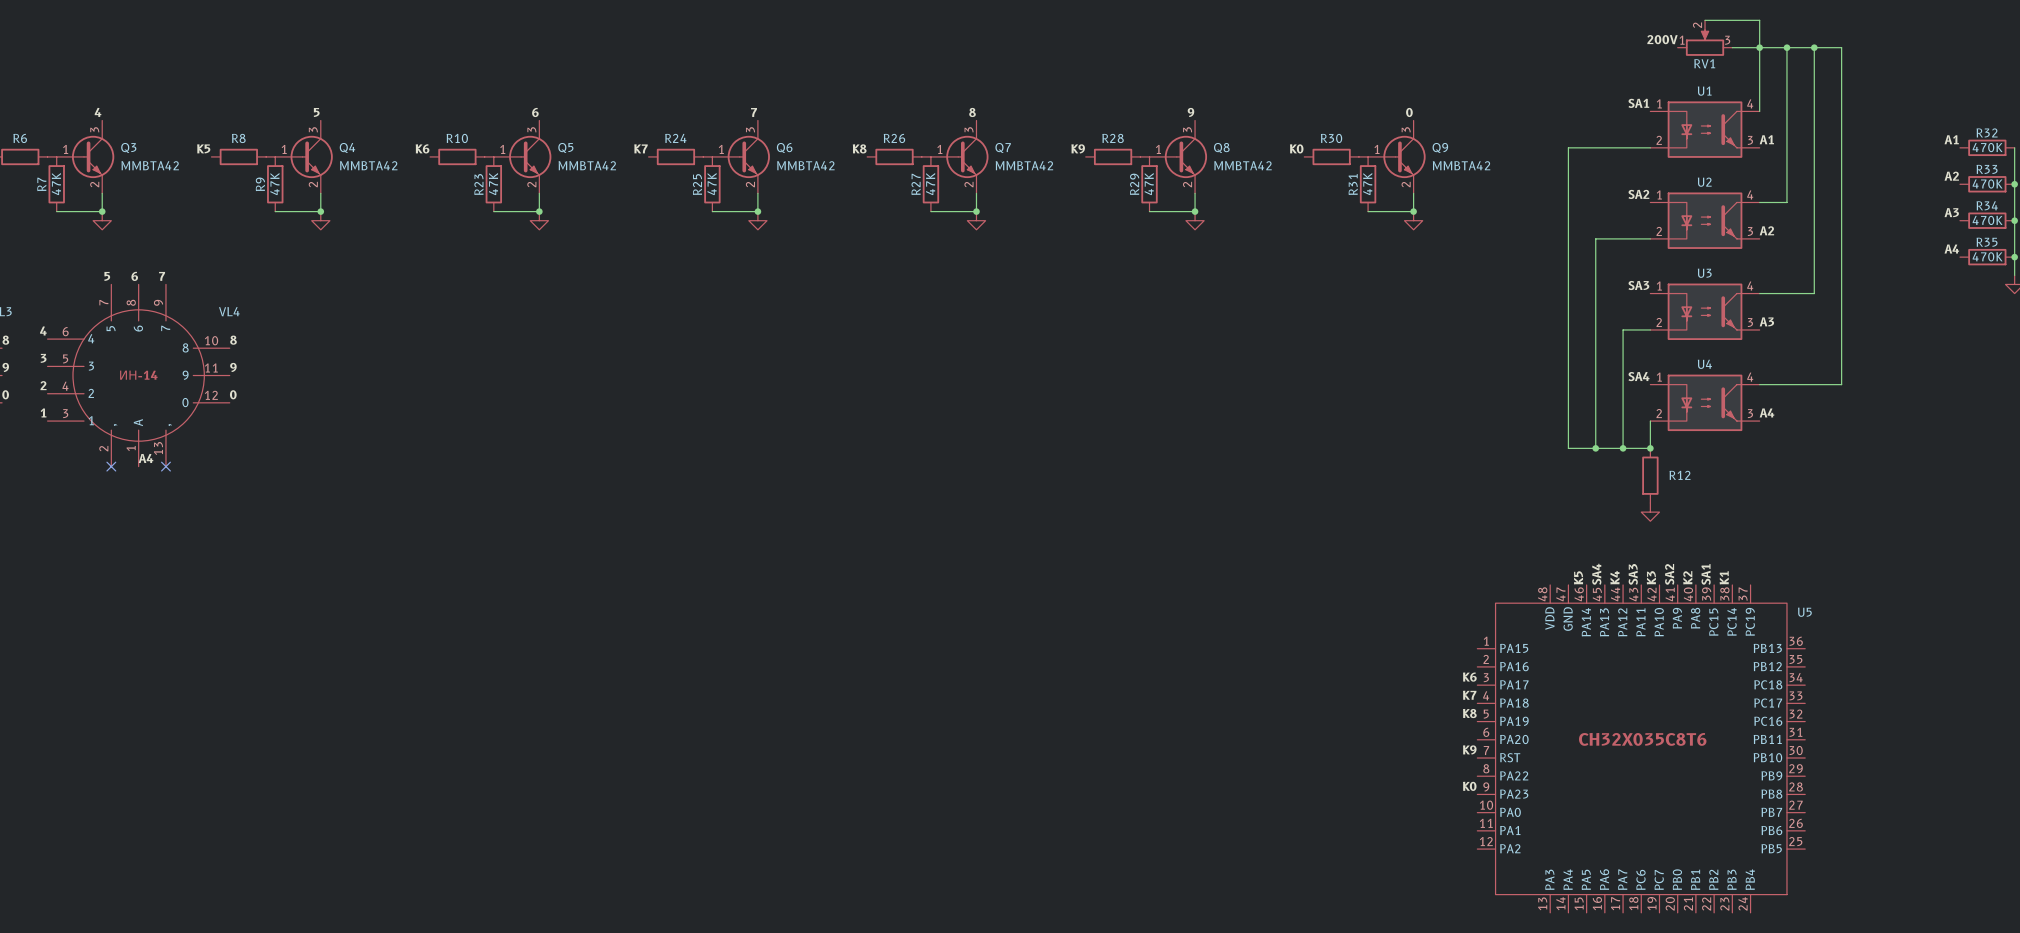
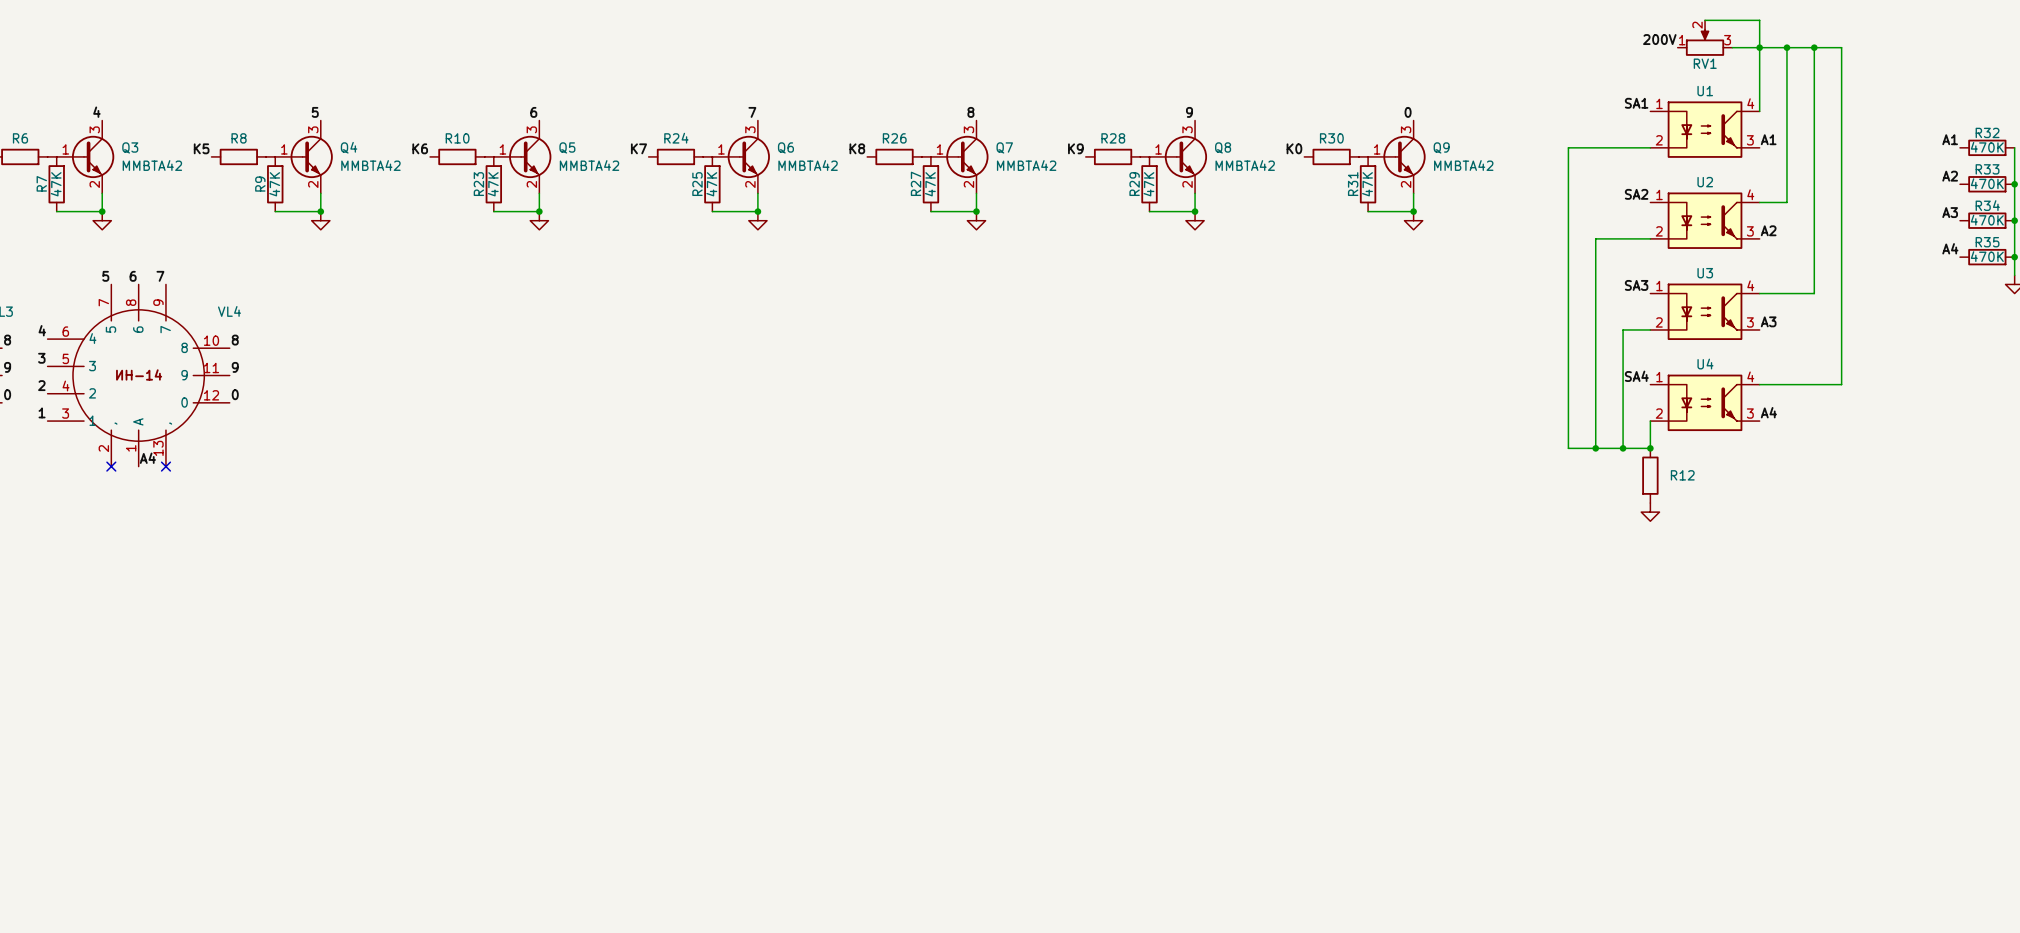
label: SA4 (1596, 574) -> none
label: SA3 (1633, 574) -> none
label: SA2 (1669, 574) -> none
label: SA1 (1706, 574) -> none
label: K5 (1578, 577) -> none
label: K4 (1614, 577) -> none
label: K3 (1651, 577) -> none
label: K2 (1687, 577) -> none
label: K1 (1724, 577) -> none
label: K6 (1469, 677) -> none
label: K7 (1469, 695) -> none
label: K8 (1469, 713) -> none
U5: (1641, 748) -> none
label: K9 (1469, 749) -> none
label: K0 (1469, 786) -> none

